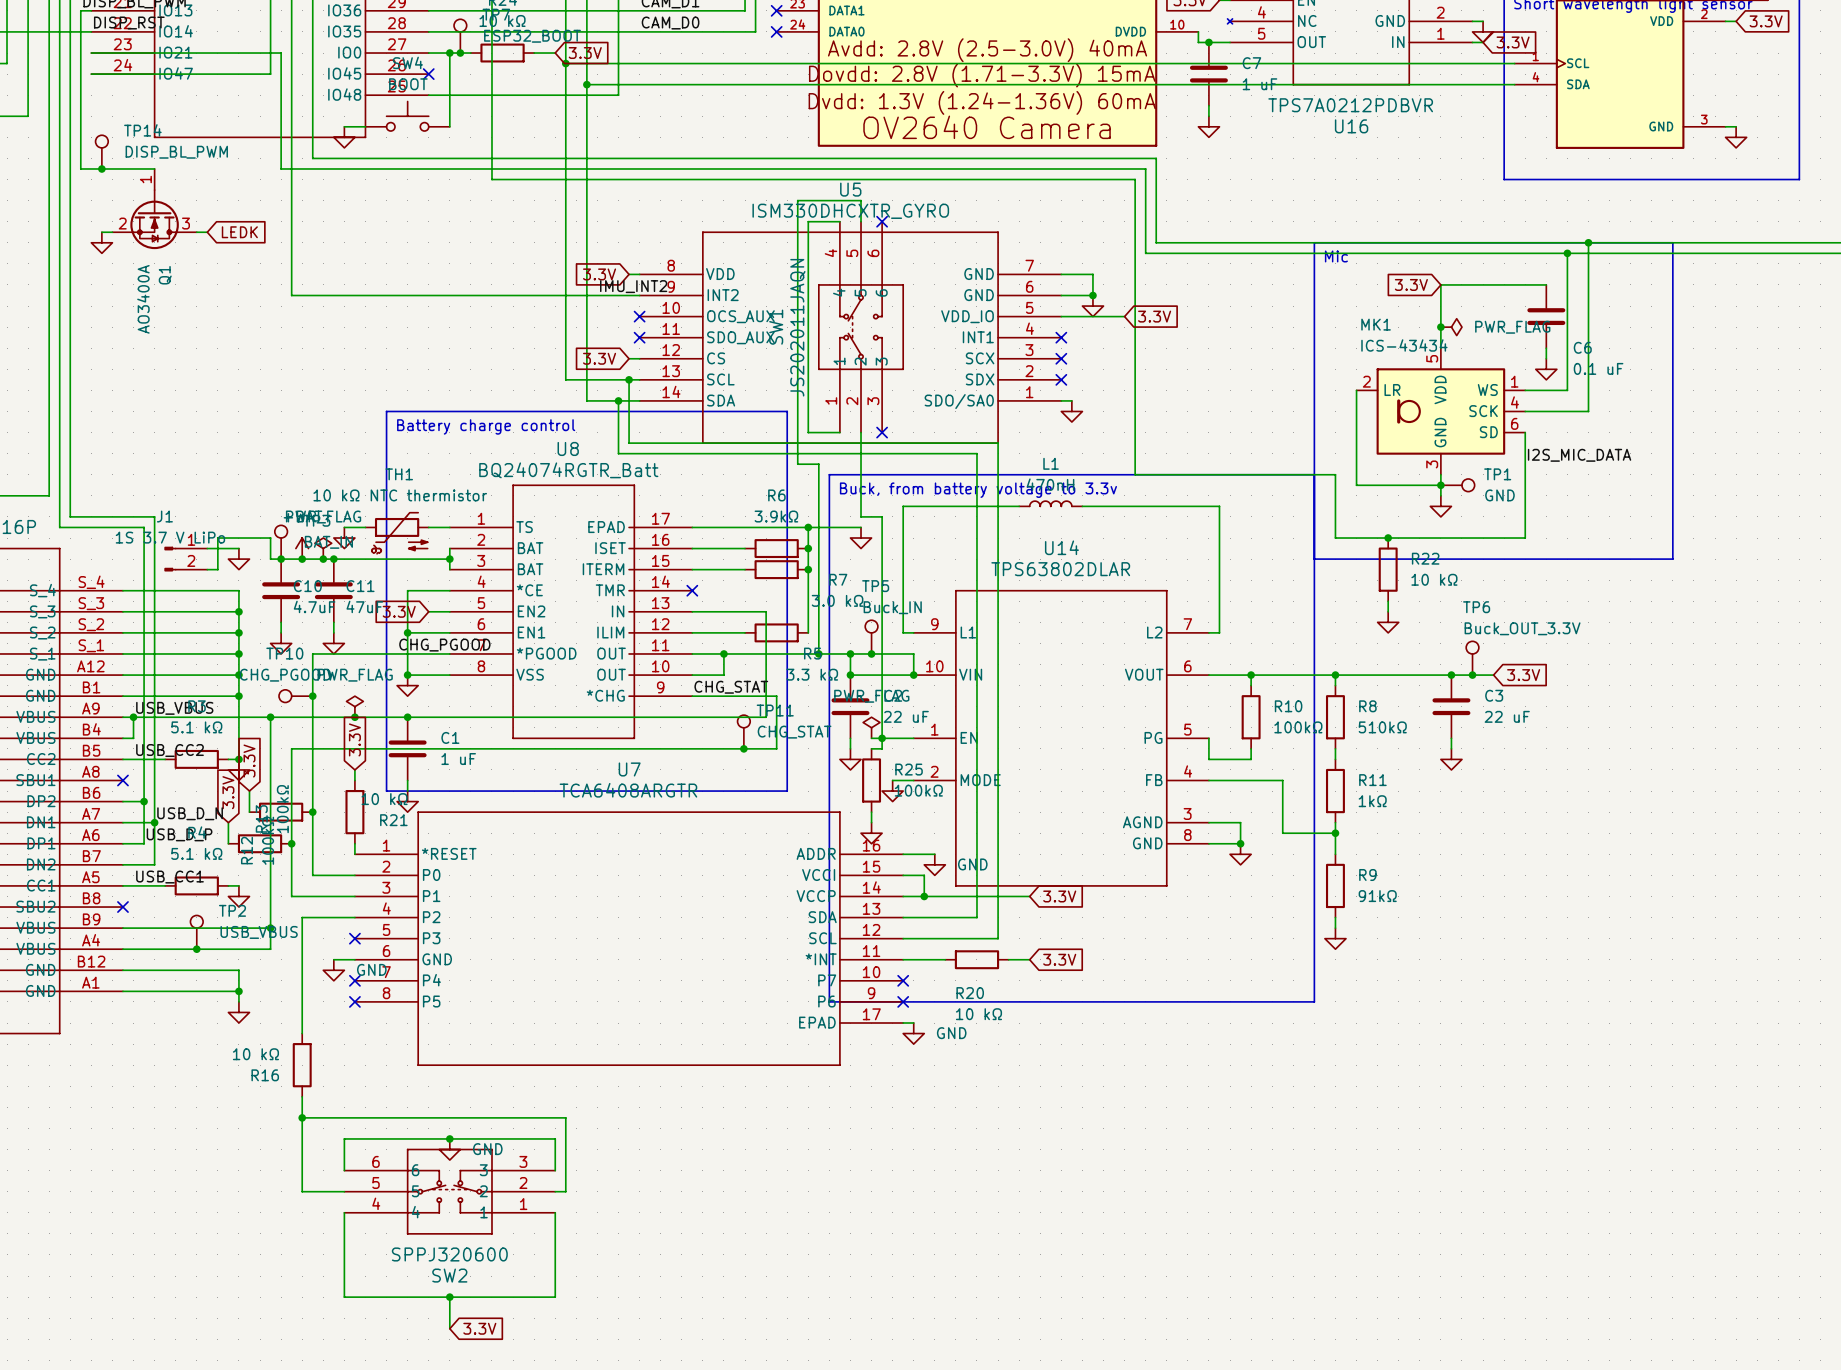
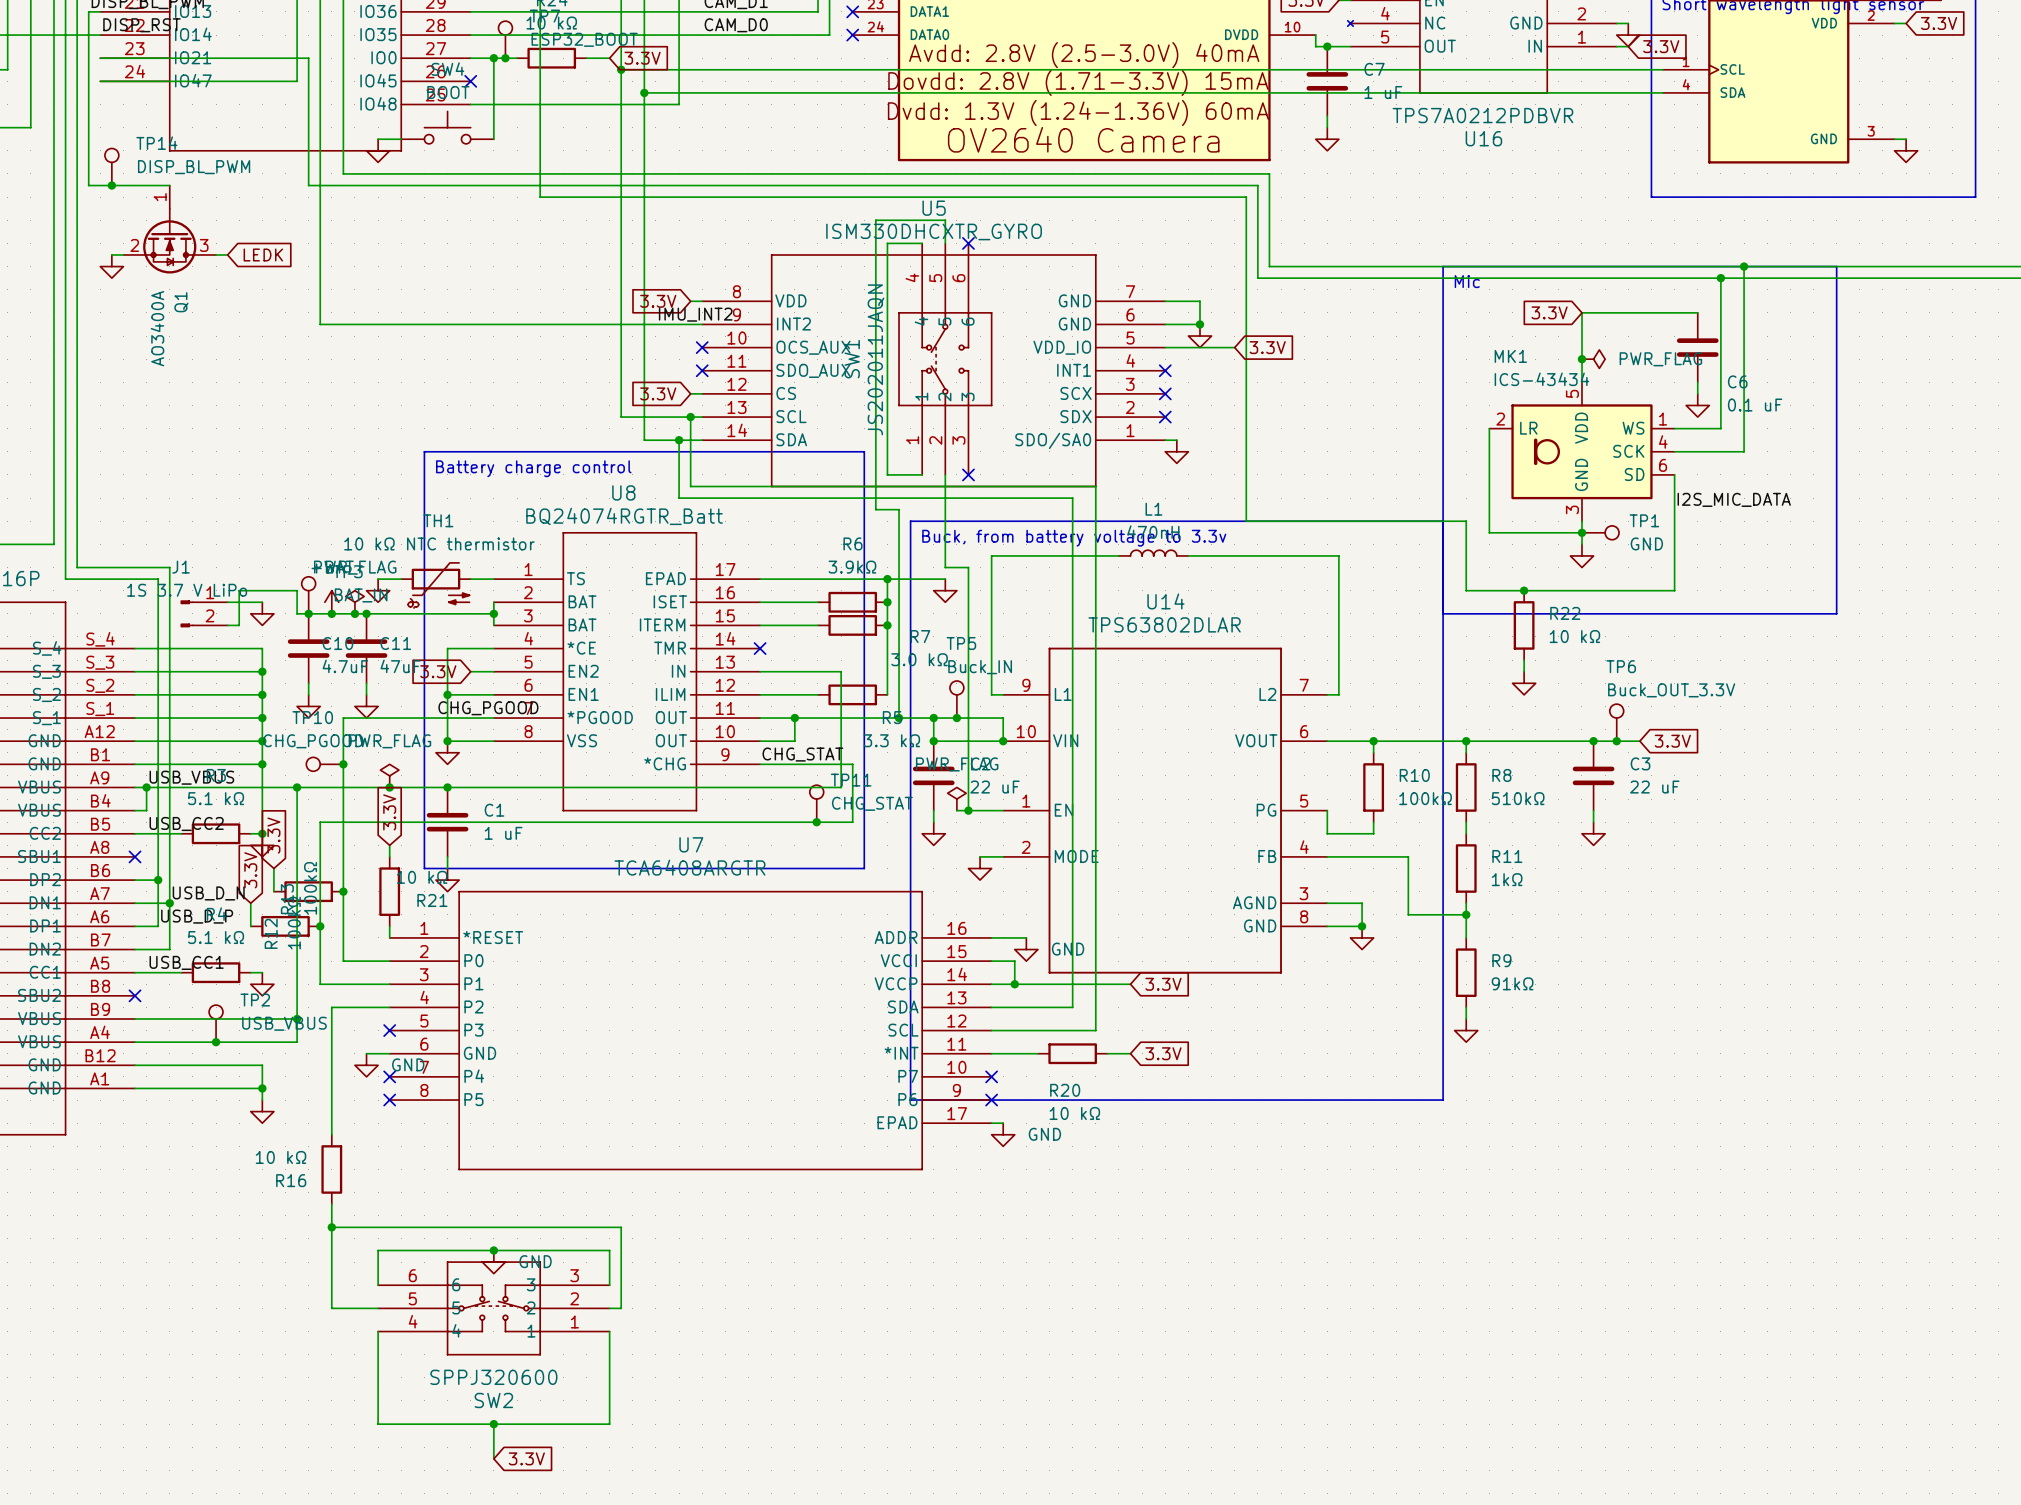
wire: (882, 738) (882, 748) (871, 748) -> none
R25: 100kΩ (871, 780) -> none
wire: (871, 812) (871, 822) -> none
power symbol: (871, 833) -> none

